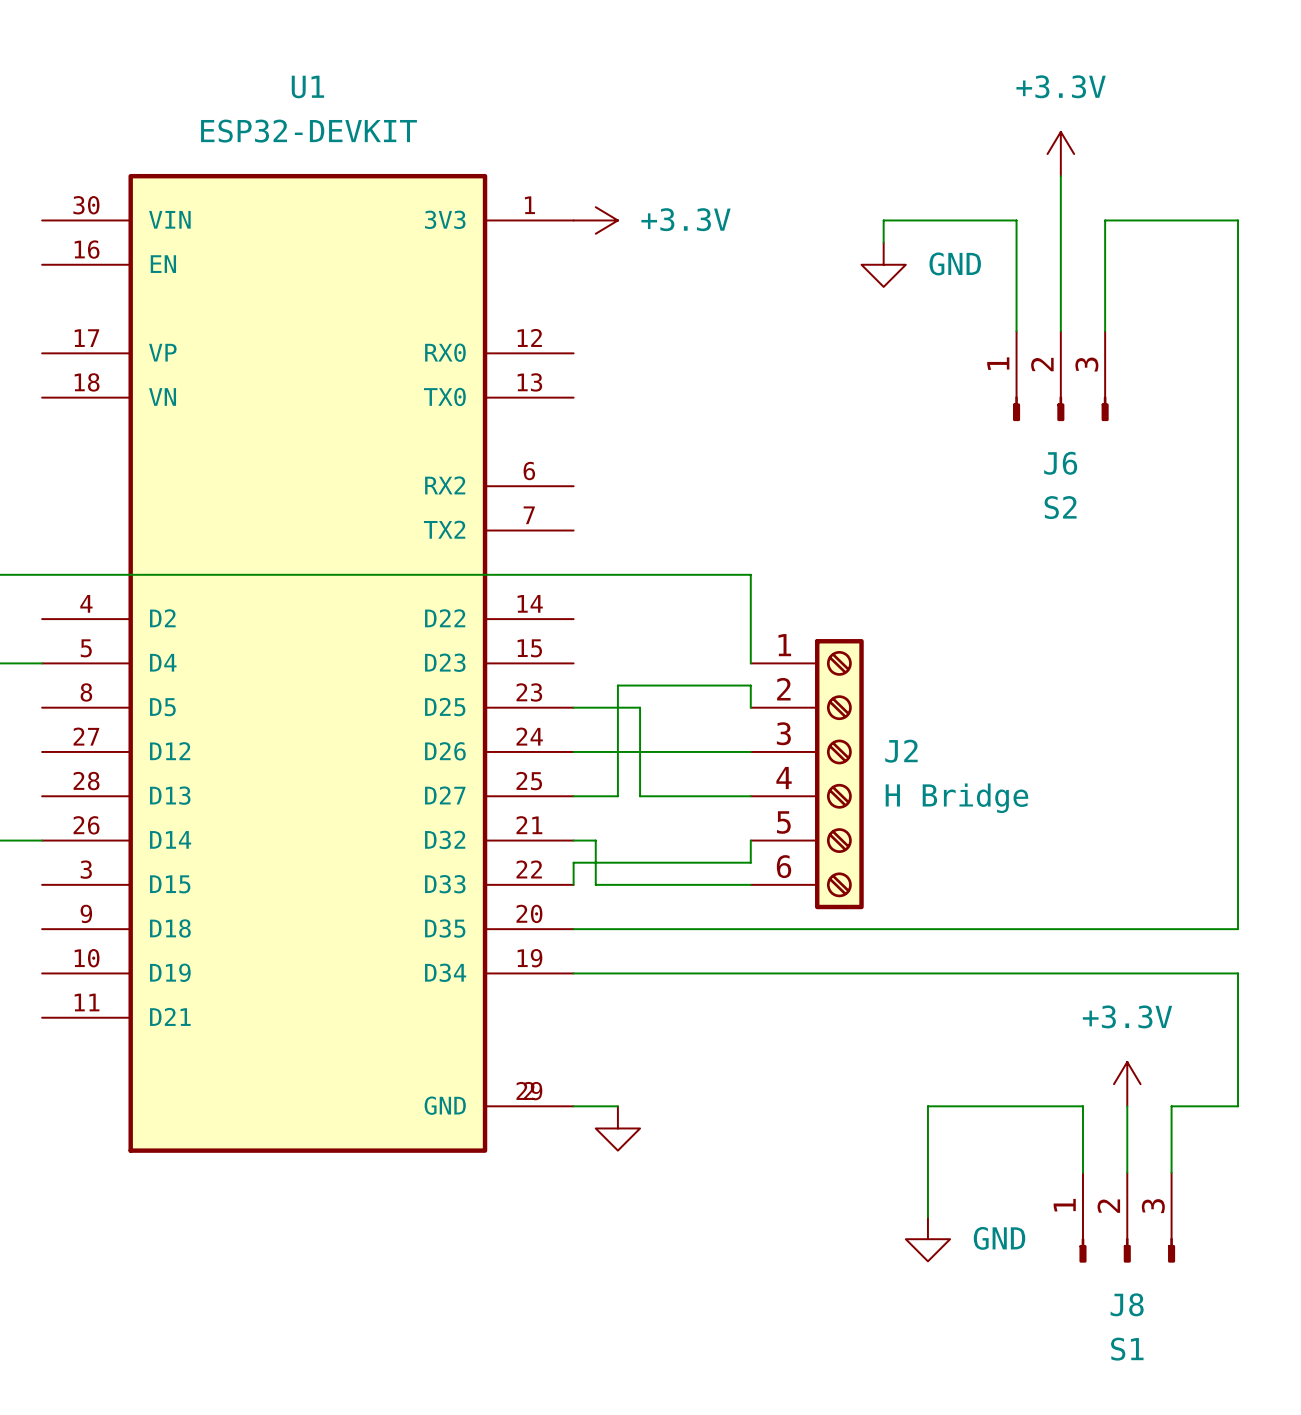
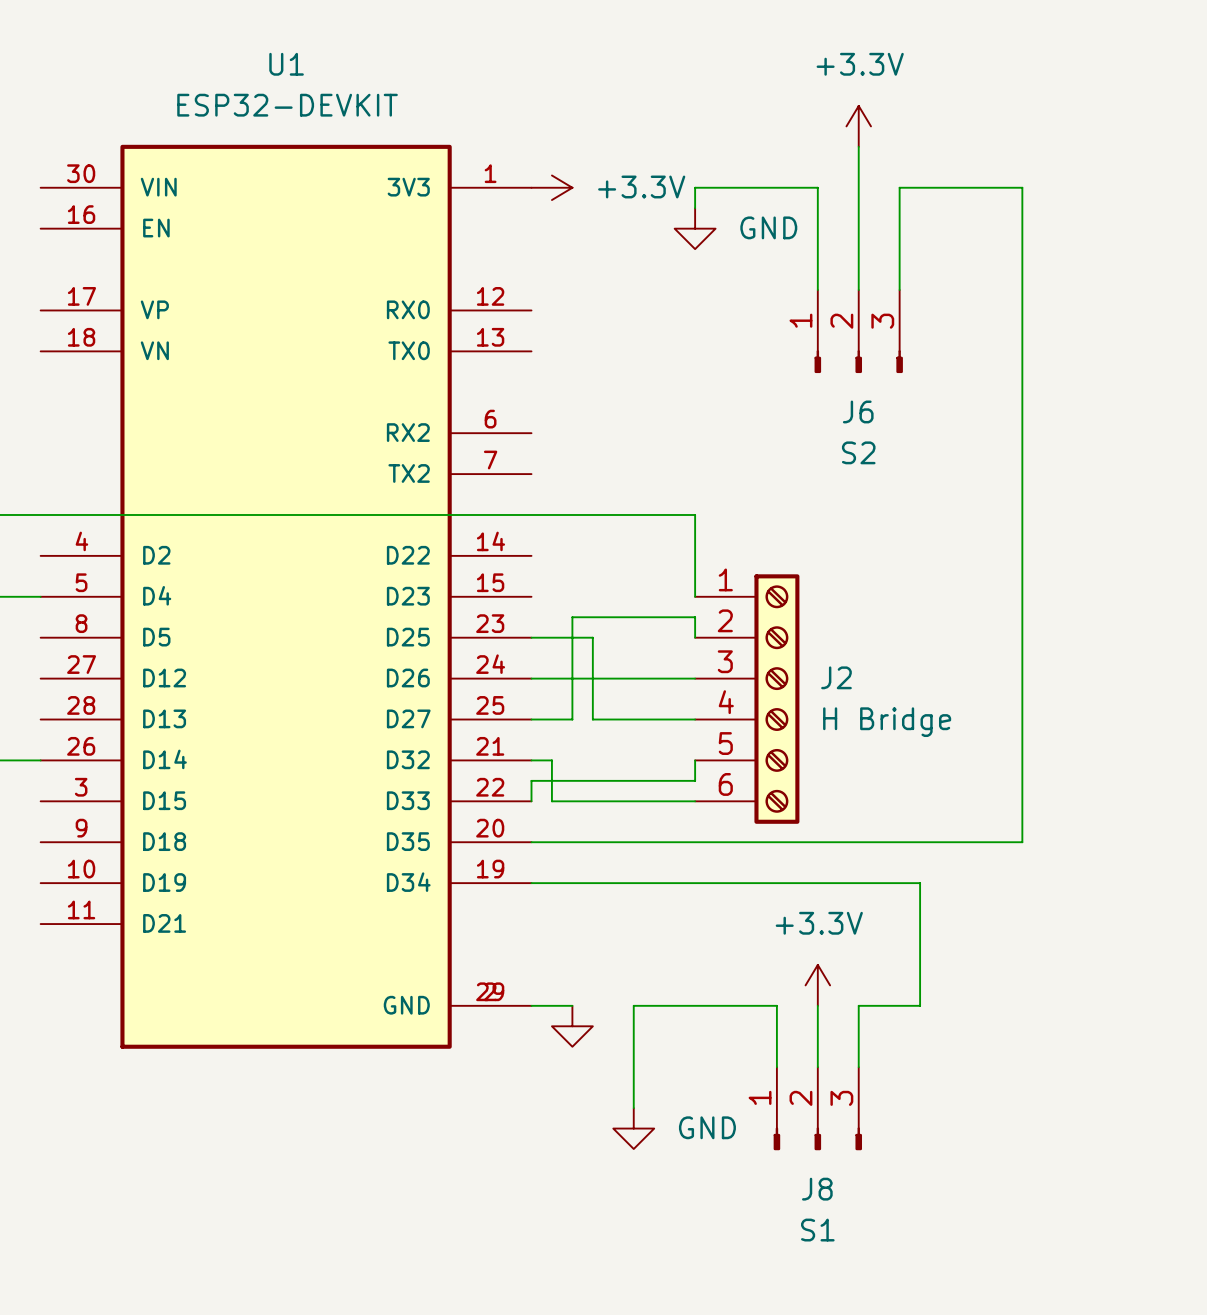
power symbol position: +3.3V (1060, 154) -> +3.3V (858, 126)
wire: (1060, 176) (1060, 331) -> (858, 146) (858, 290)
wire: (883, 220) (972, 220) -> (899, 290) (899, 187)
wire: none -> (817, 187) (695, 187) (695, 208)
wire: (1016, 220) (1016, 331) -> (940, 187) (1022, 187)
wire: (1105, 220) (1238, 220) (1238, 929) (1105, 929) -> (1022, 290) (1022, 842)
wire: none -> (817, 208) (817, 290)
power symbol position: GND (883, 264) -> GND (695, 228)
J6 position: (1060, 376) -> (858, 331)
wire: (994, 973) (1238, 973) (1238, 1106) (1171, 1106) (1171, 1172) -> (920, 883) (920, 1005)
power symbol position: +3.3V (1127, 1084) -> +3.3V (817, 985)
wire: (994, 1106) (1082, 1106) (1082, 1172) -> none
wire: (1127, 1106) (1127, 1172) -> (817, 1005) (817, 1067)
wire: none -> (776, 1067) (776, 1005) (633, 1005) (633, 1108)
J8 position: (1127, 1217) -> (817, 1108)
power symbol position: GND (927, 1239) -> GND (633, 1128)

